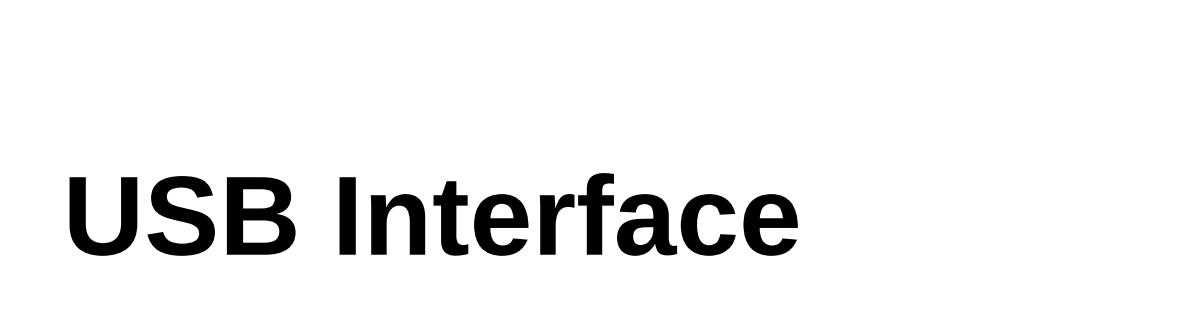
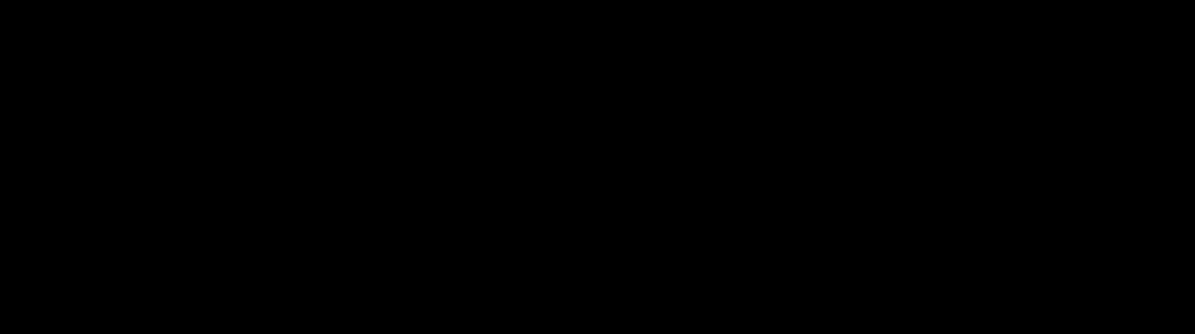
text: USB Interface (433, 214) -> none

